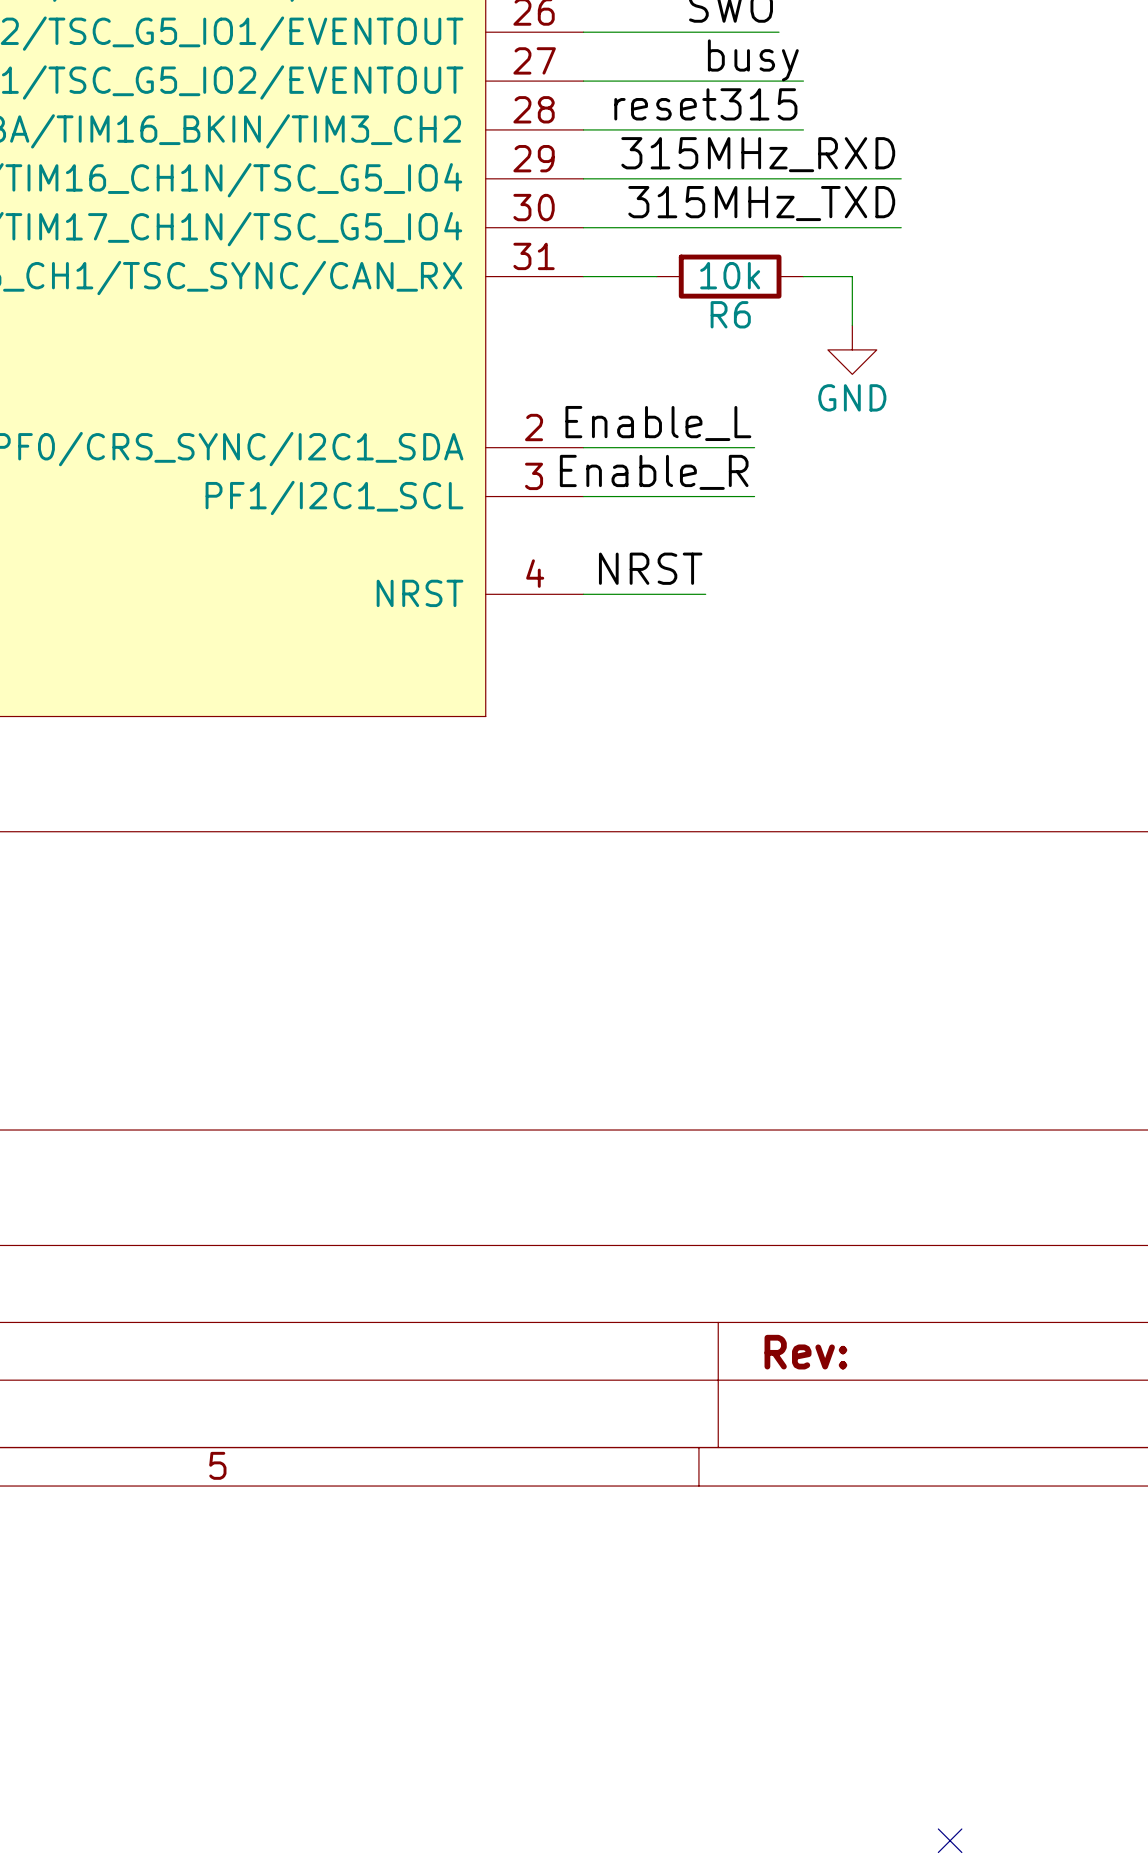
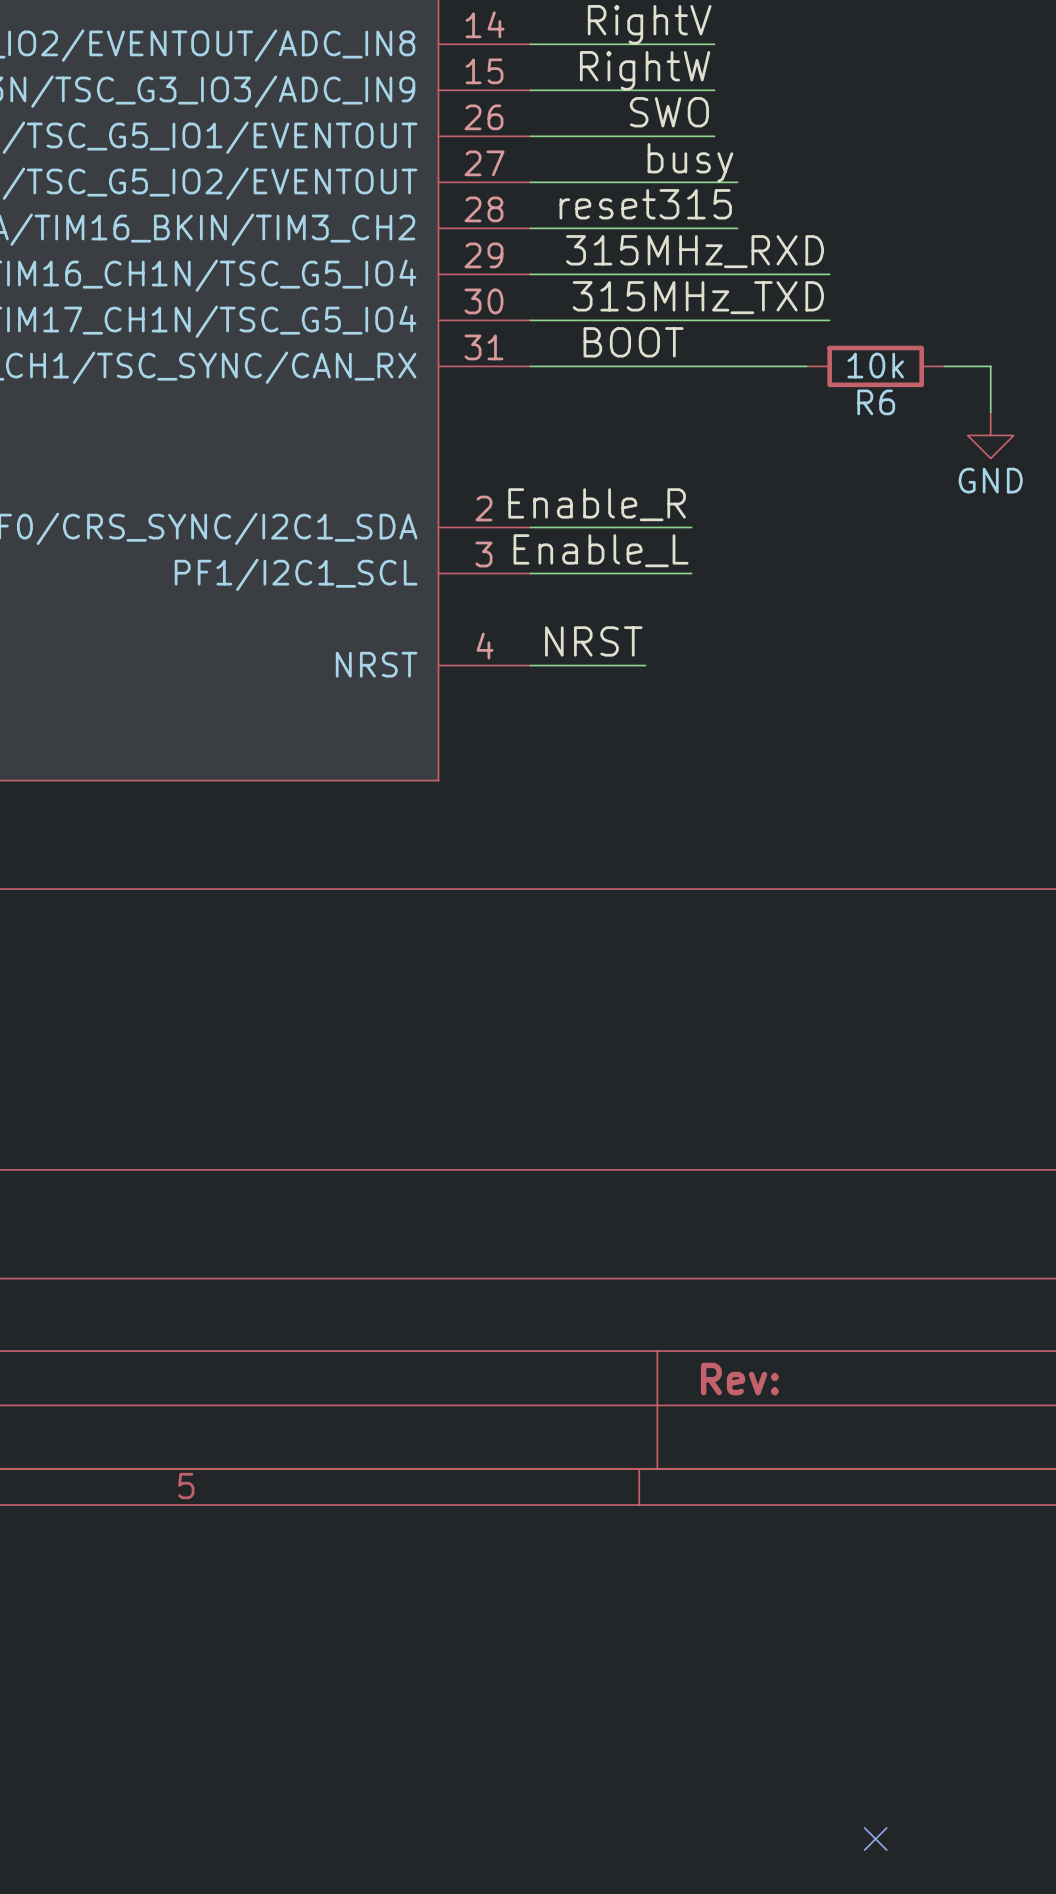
label: none -> BOOT (633, 342)
wire: none -> (599, 366) (737, 366)
R6 position: (730, 276) -> (875, 366)
wire: (852, 276) (852, 325) -> (783, 366) (806, 366)
wire: none -> (944, 366) (990, 366) (990, 412)
power symbol position: GND (852, 349) -> GND (990, 435)
label: Enable_L (658, 423) -> Enable_R (597, 504)
label: Enable_R (654, 472) -> Enable_L (601, 550)

